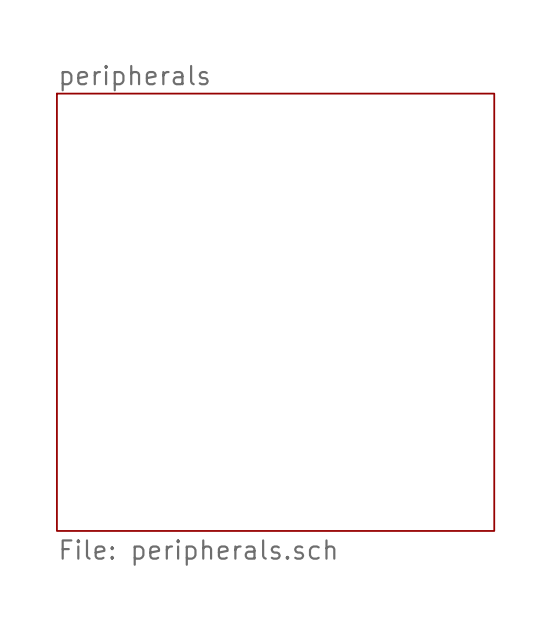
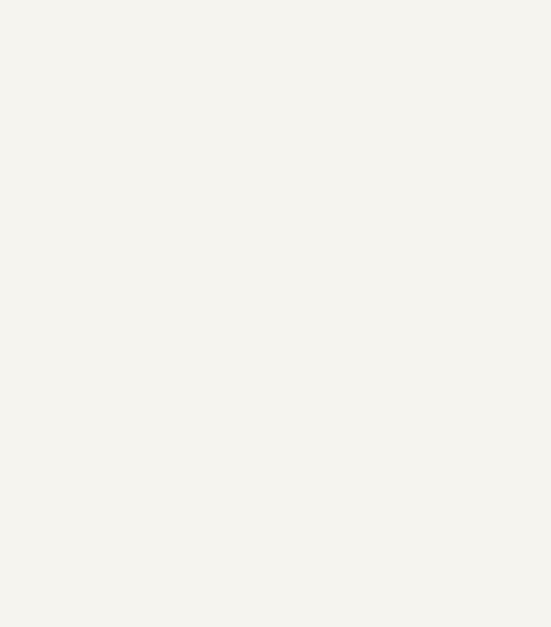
sheet peripherals: File: peripherals.sch (275, 312) -> none

